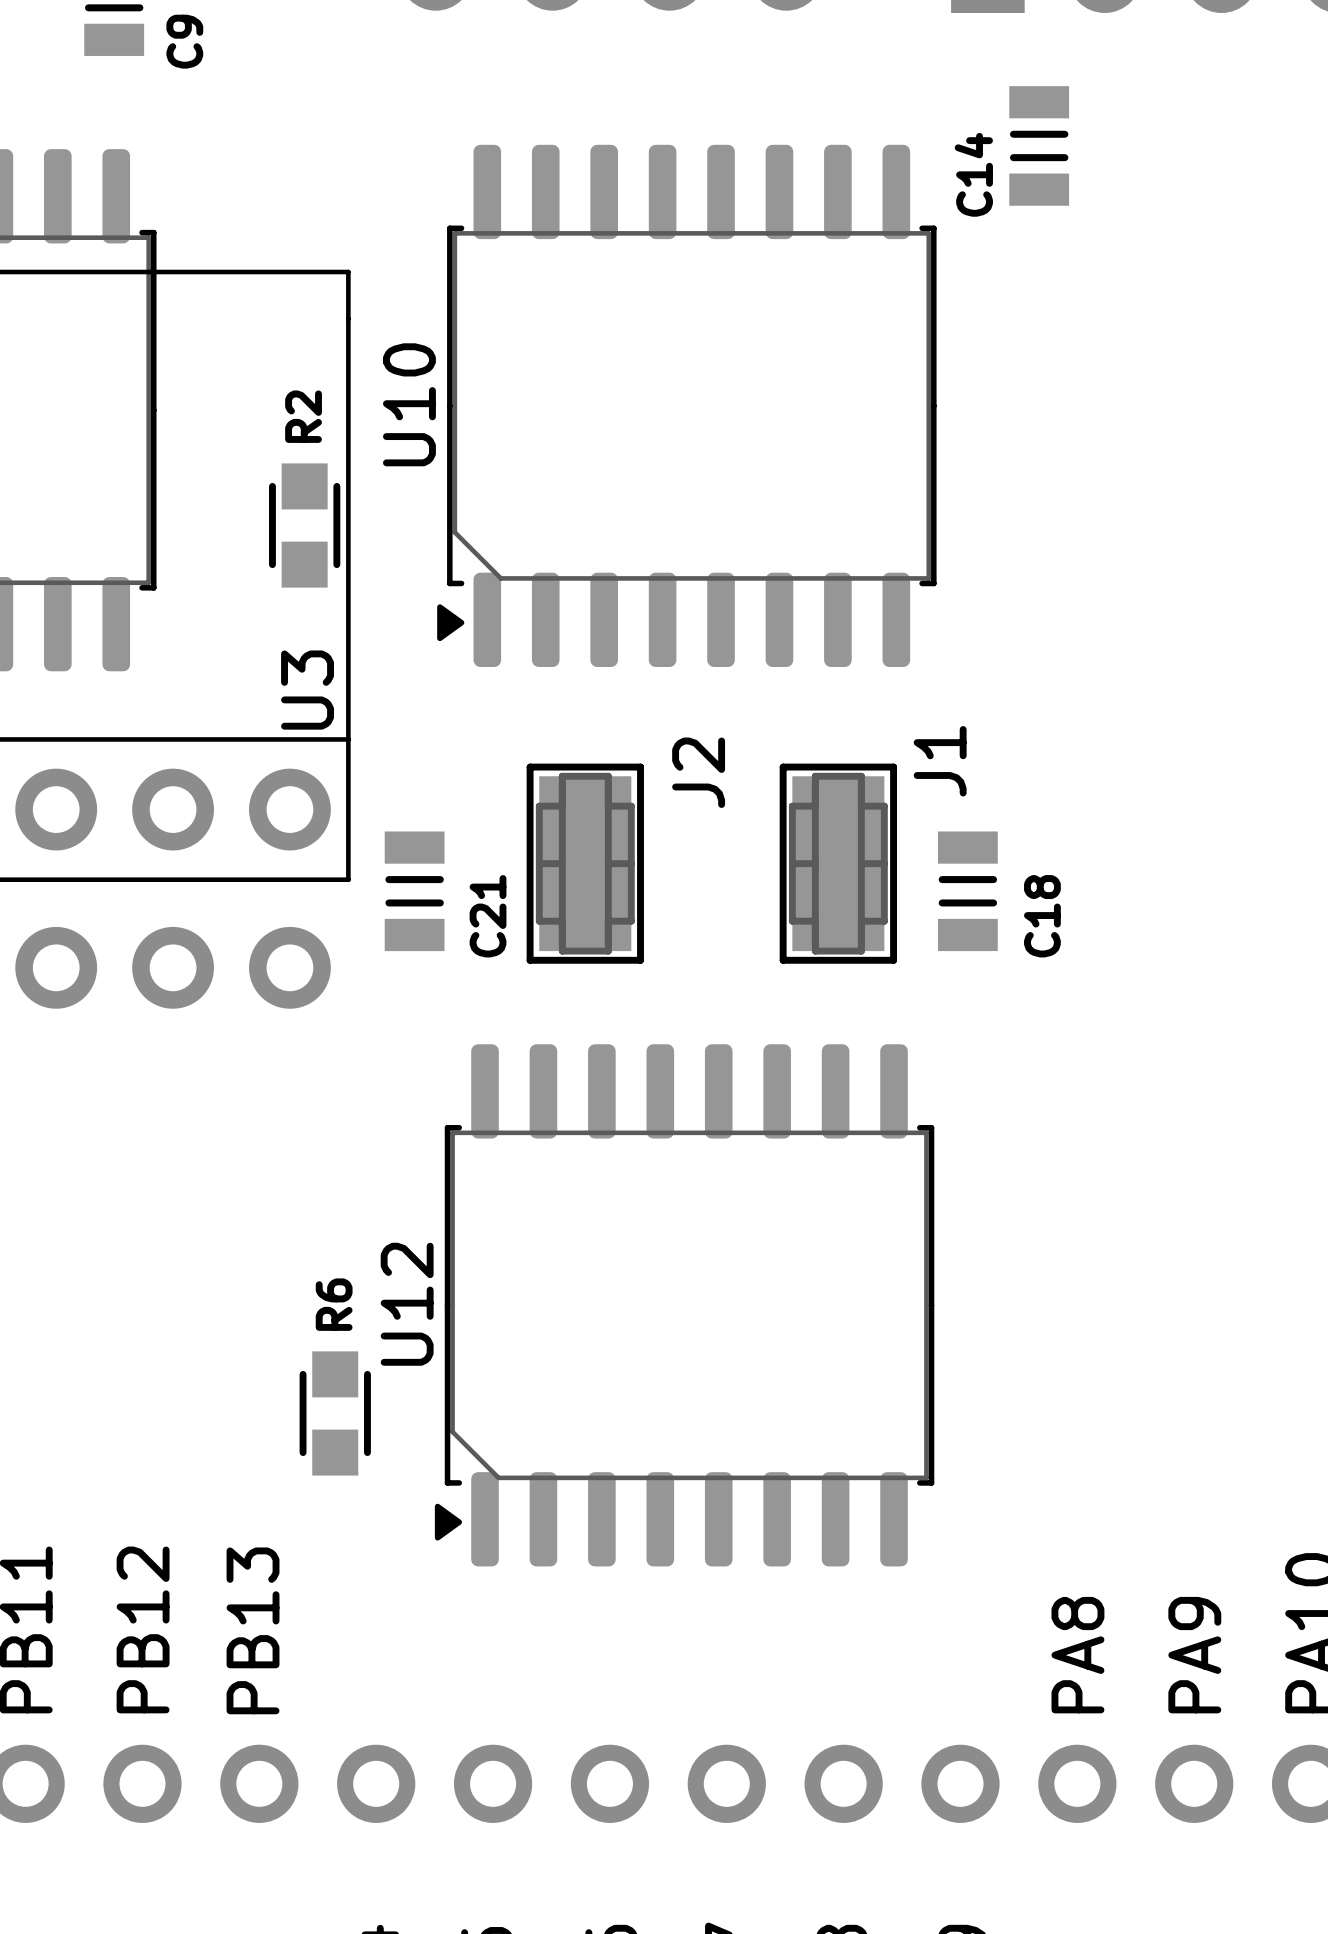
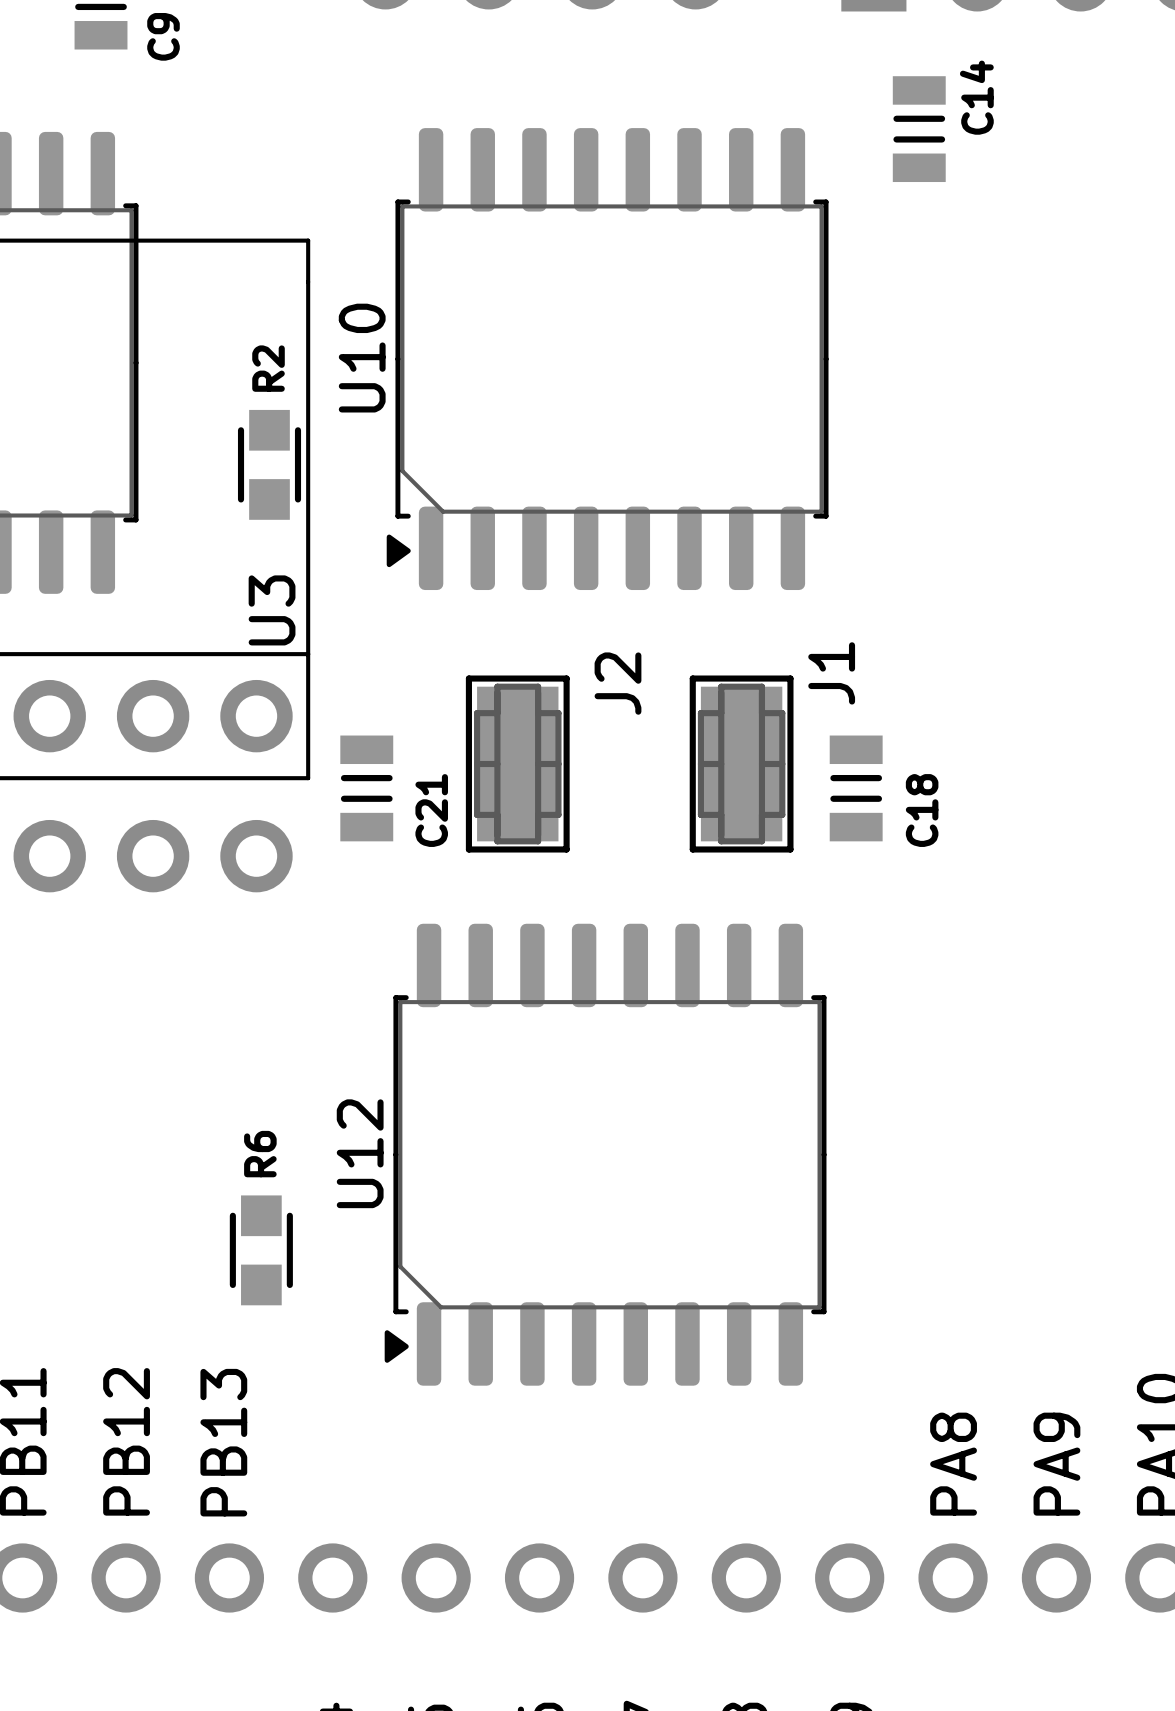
C14 name position: C14 (973, 174) -> C14 (976, 97)
R6 position: (335, 1413) -> (261, 1250)

